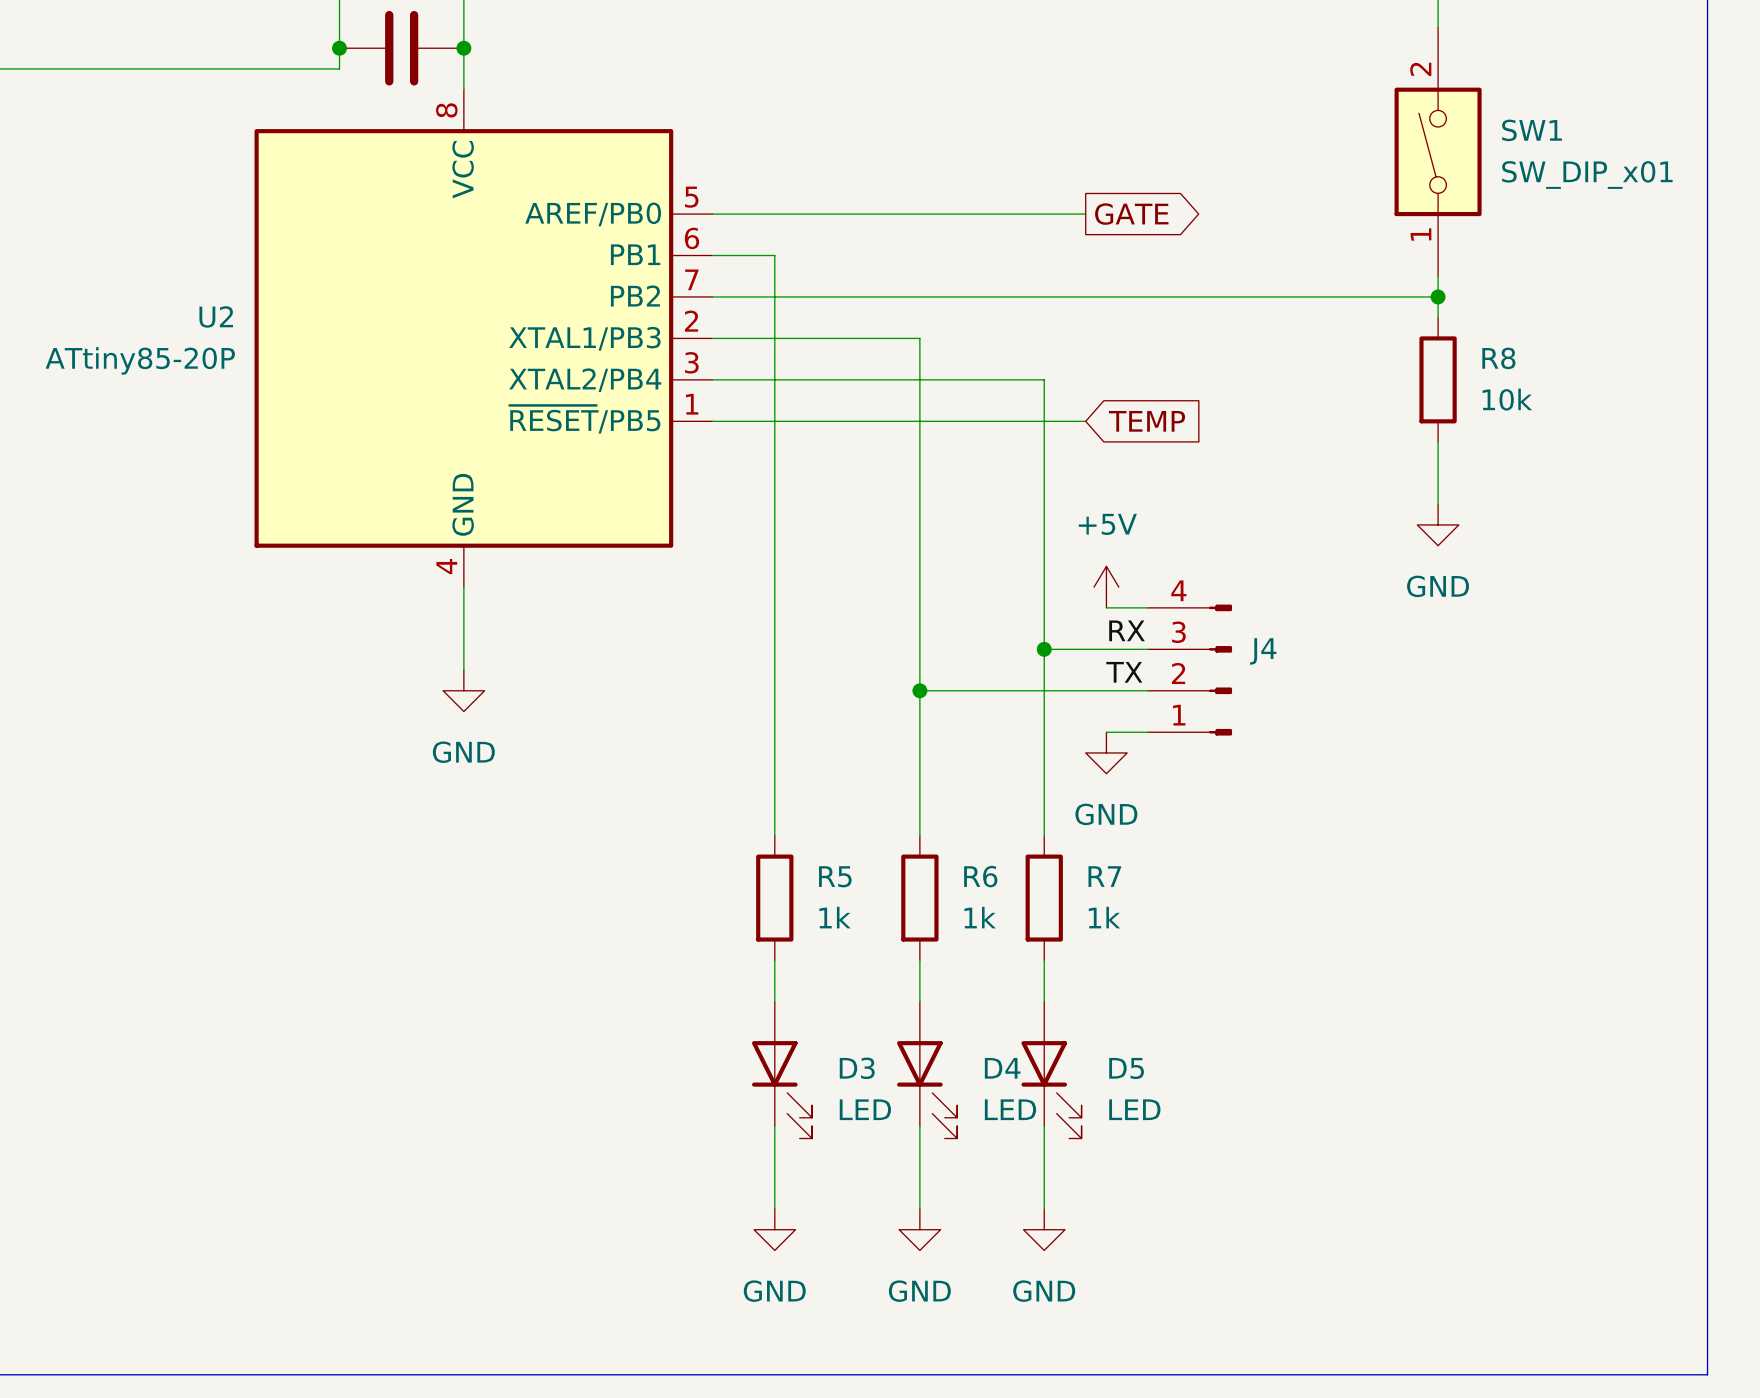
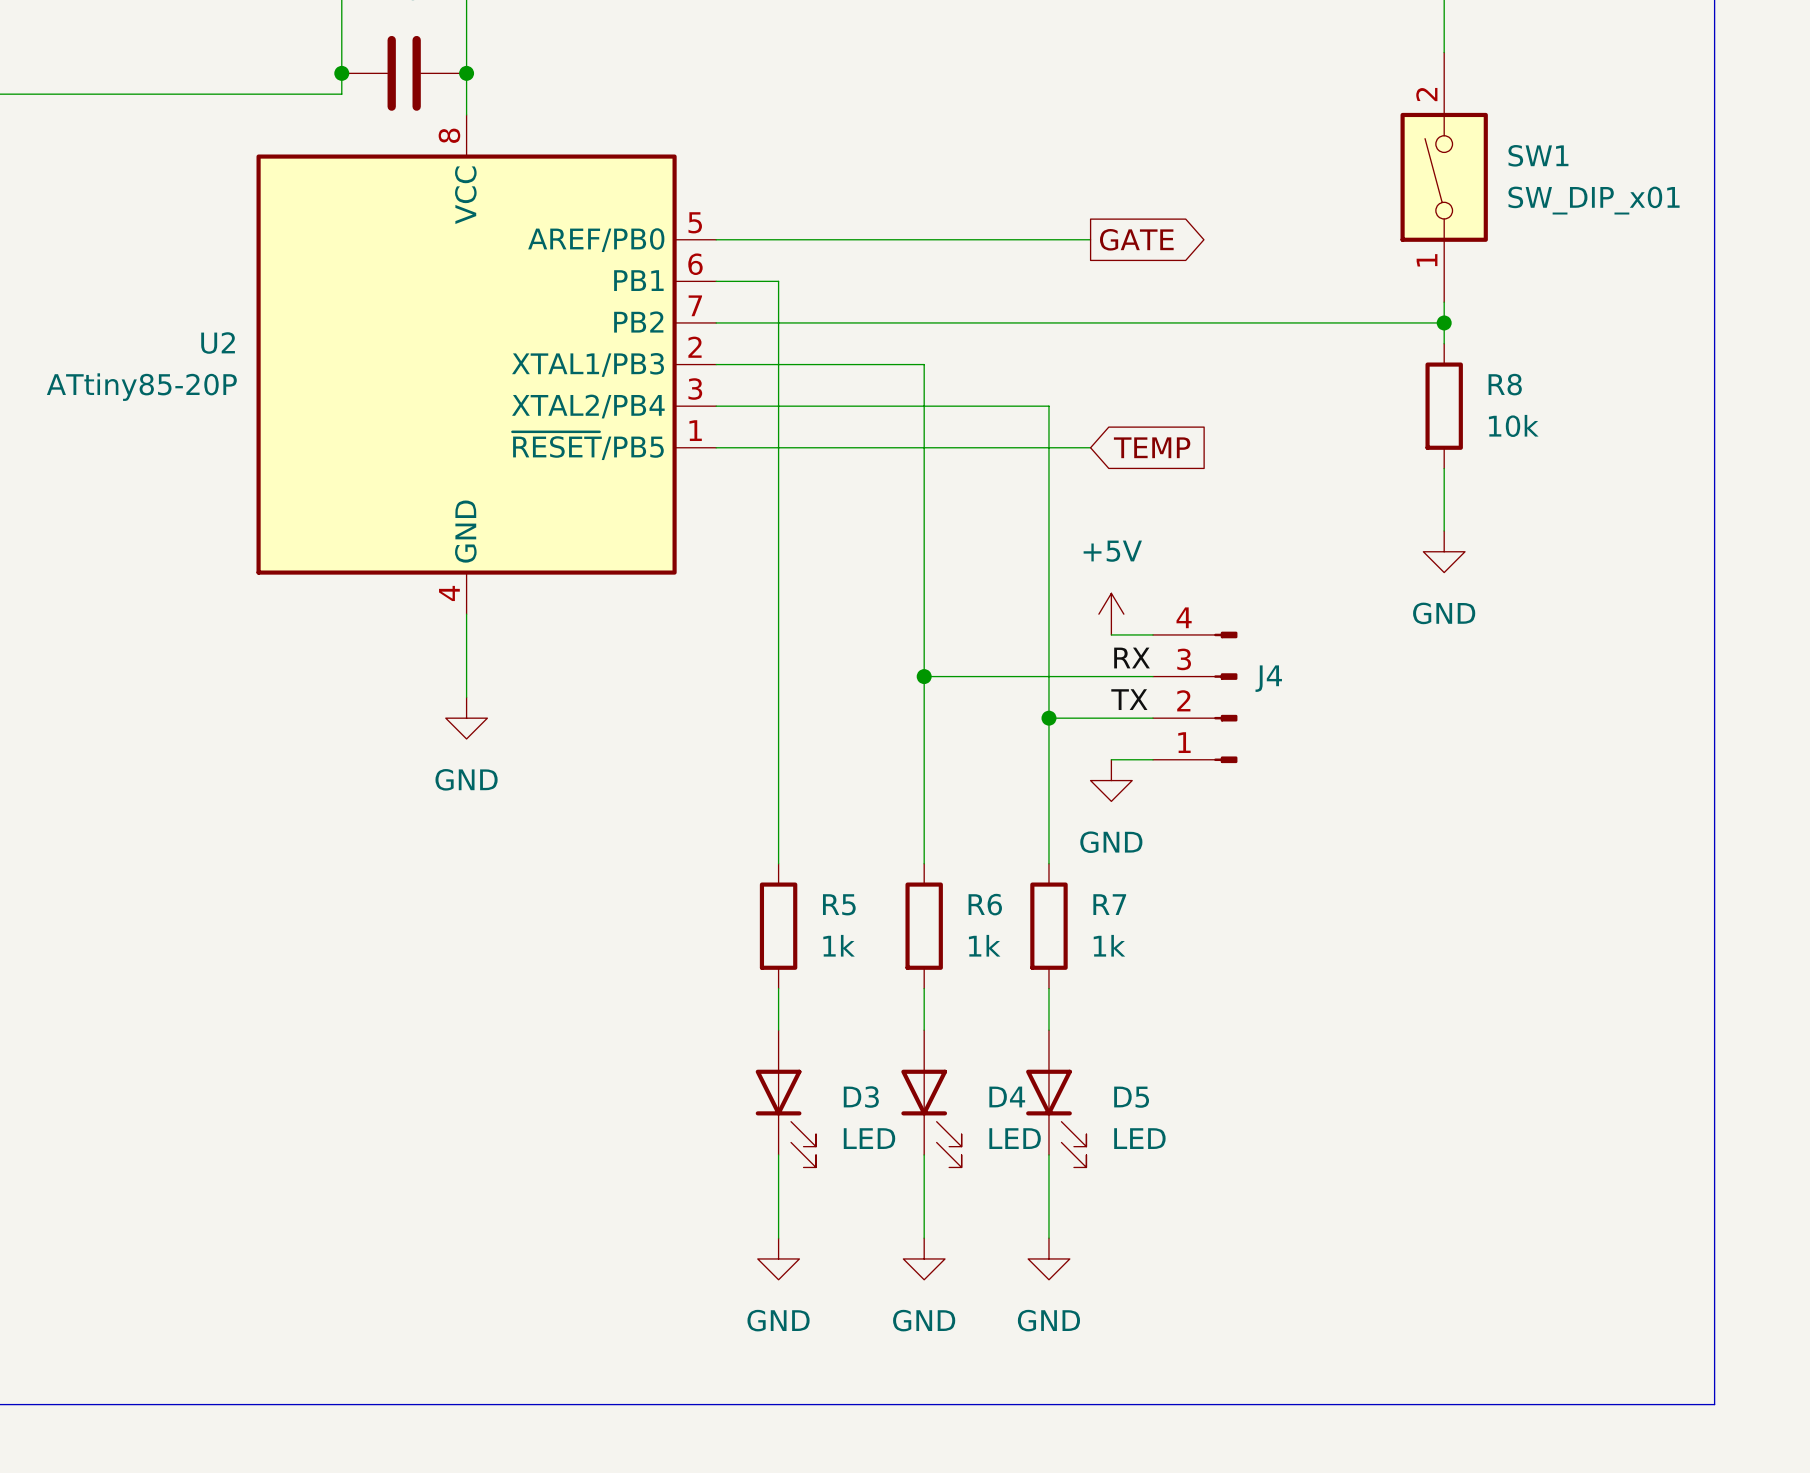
junction position: (1044, 649) -> (1048, 718)
wire: (919, 690) (1044, 690) -> (924, 676) (1048, 676)
junction position: (919, 690) -> (924, 676)

